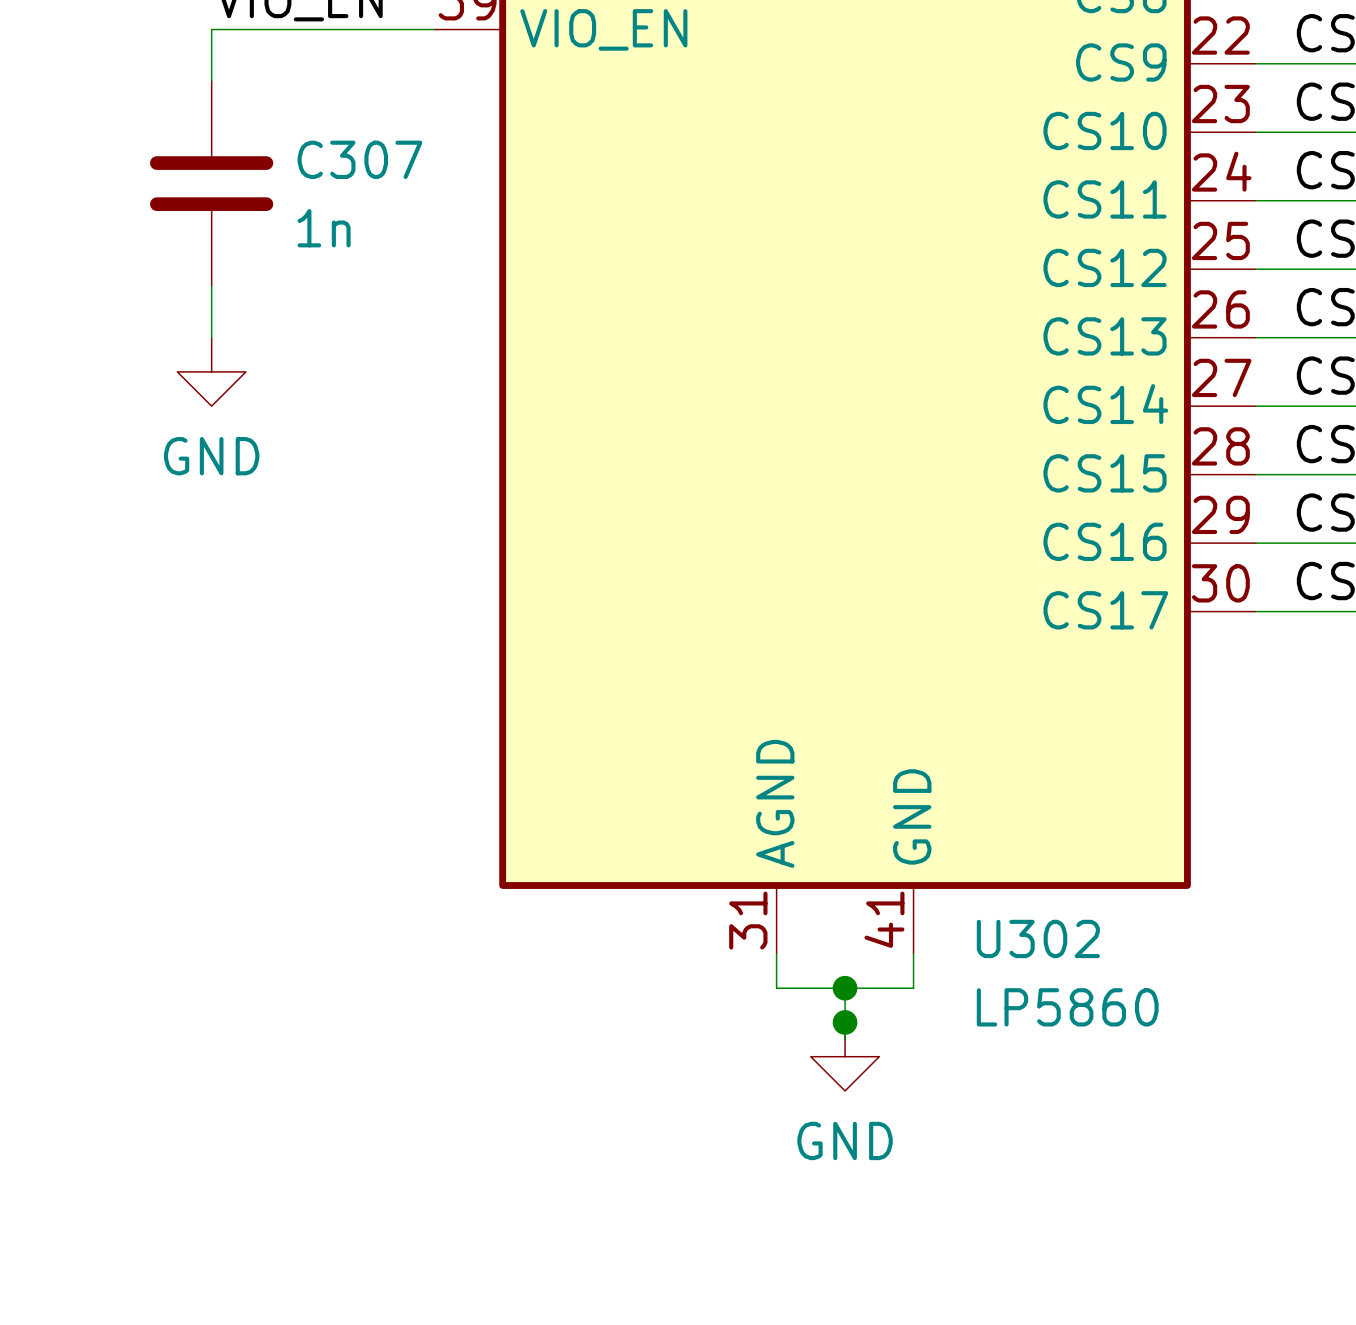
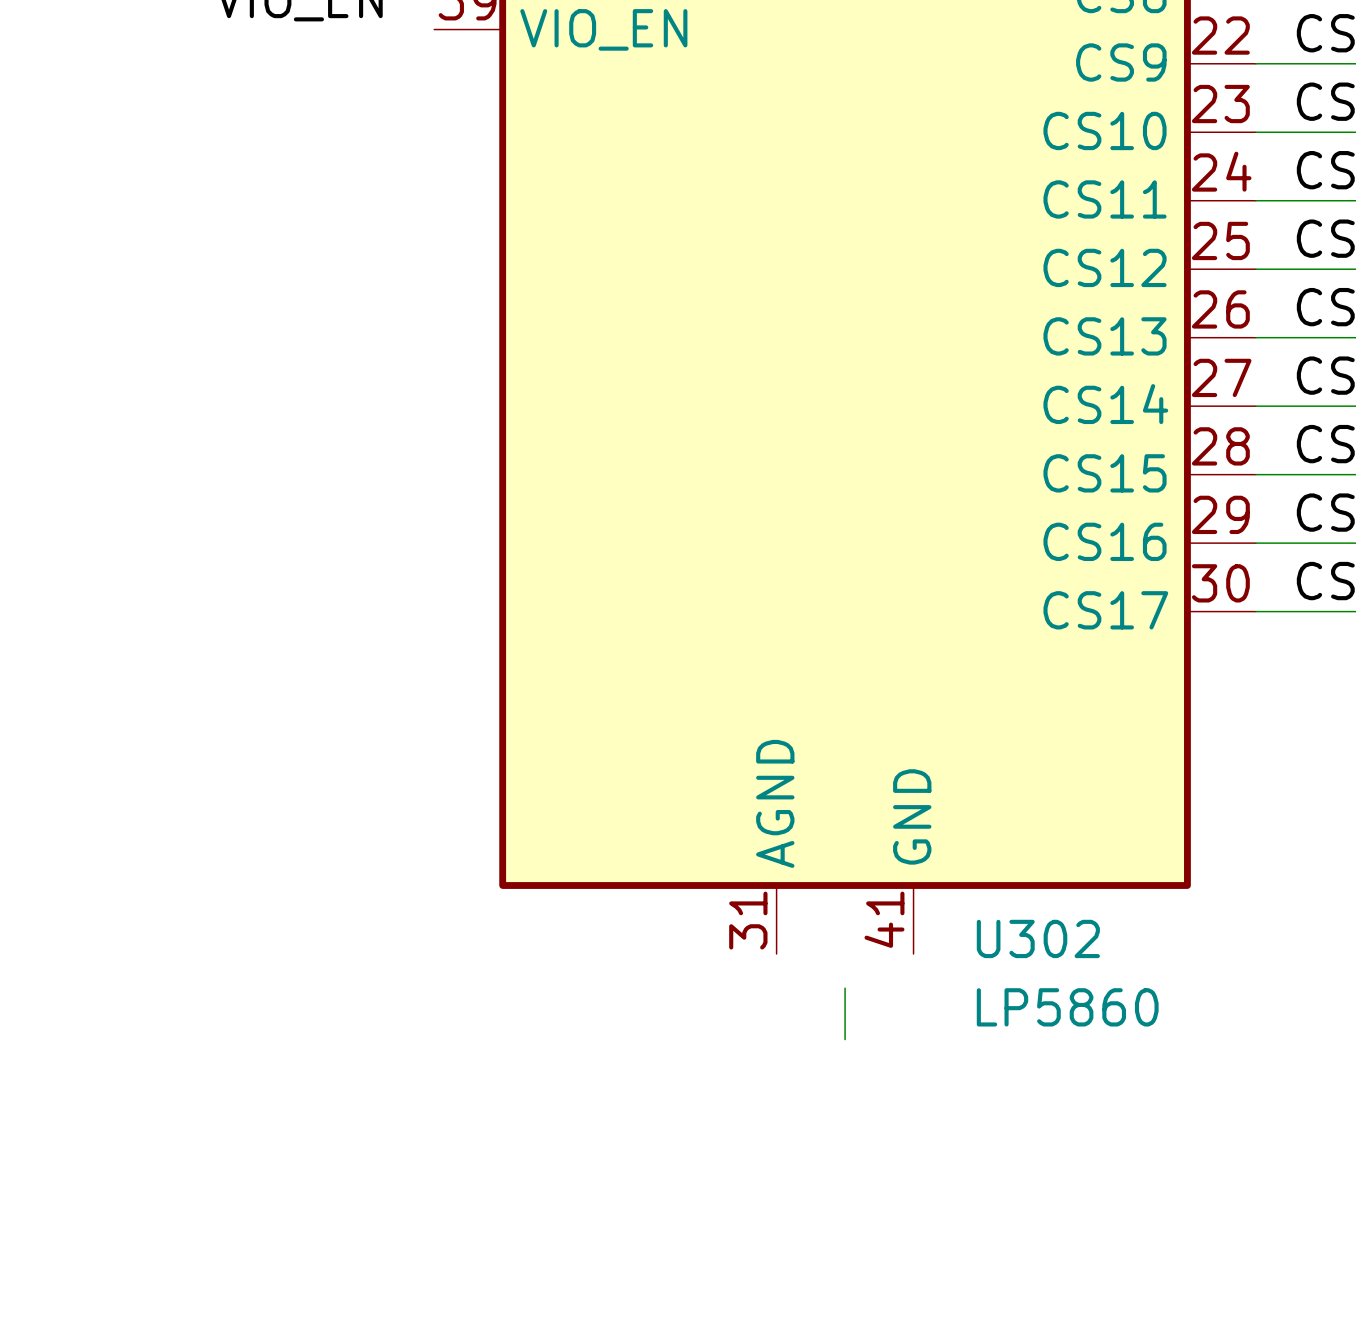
wire: (434, 29) (211, 29) (211, 80) -> none
C307: 1n (211, 183) -> none
wire: (211, 286) (211, 337) -> none
power symbol: GND (211, 371) -> none
wire: (776, 953) (776, 988) (913, 988) (913, 953) -> none
junction: (845, 988) -> none
junction: (845, 1022) -> none
power symbol: GND (845, 1056) -> none

